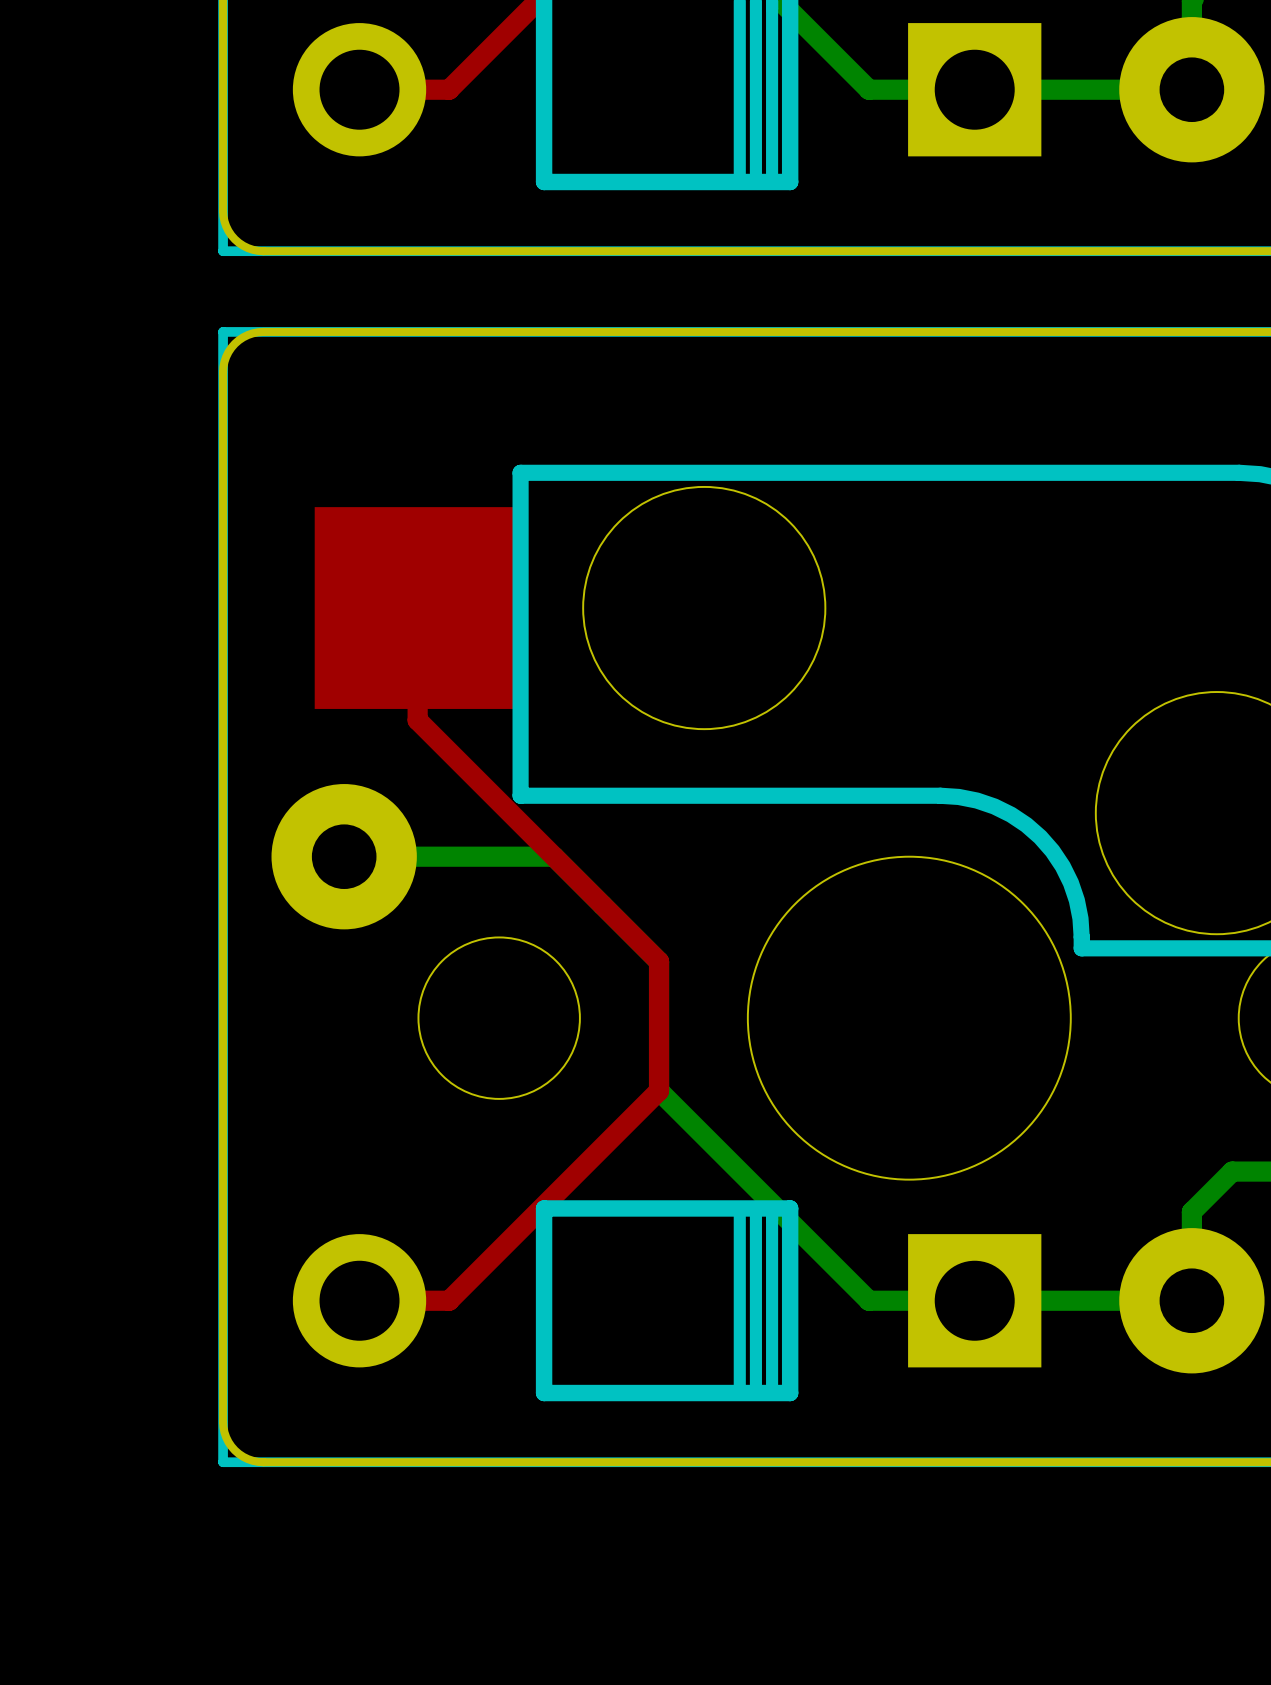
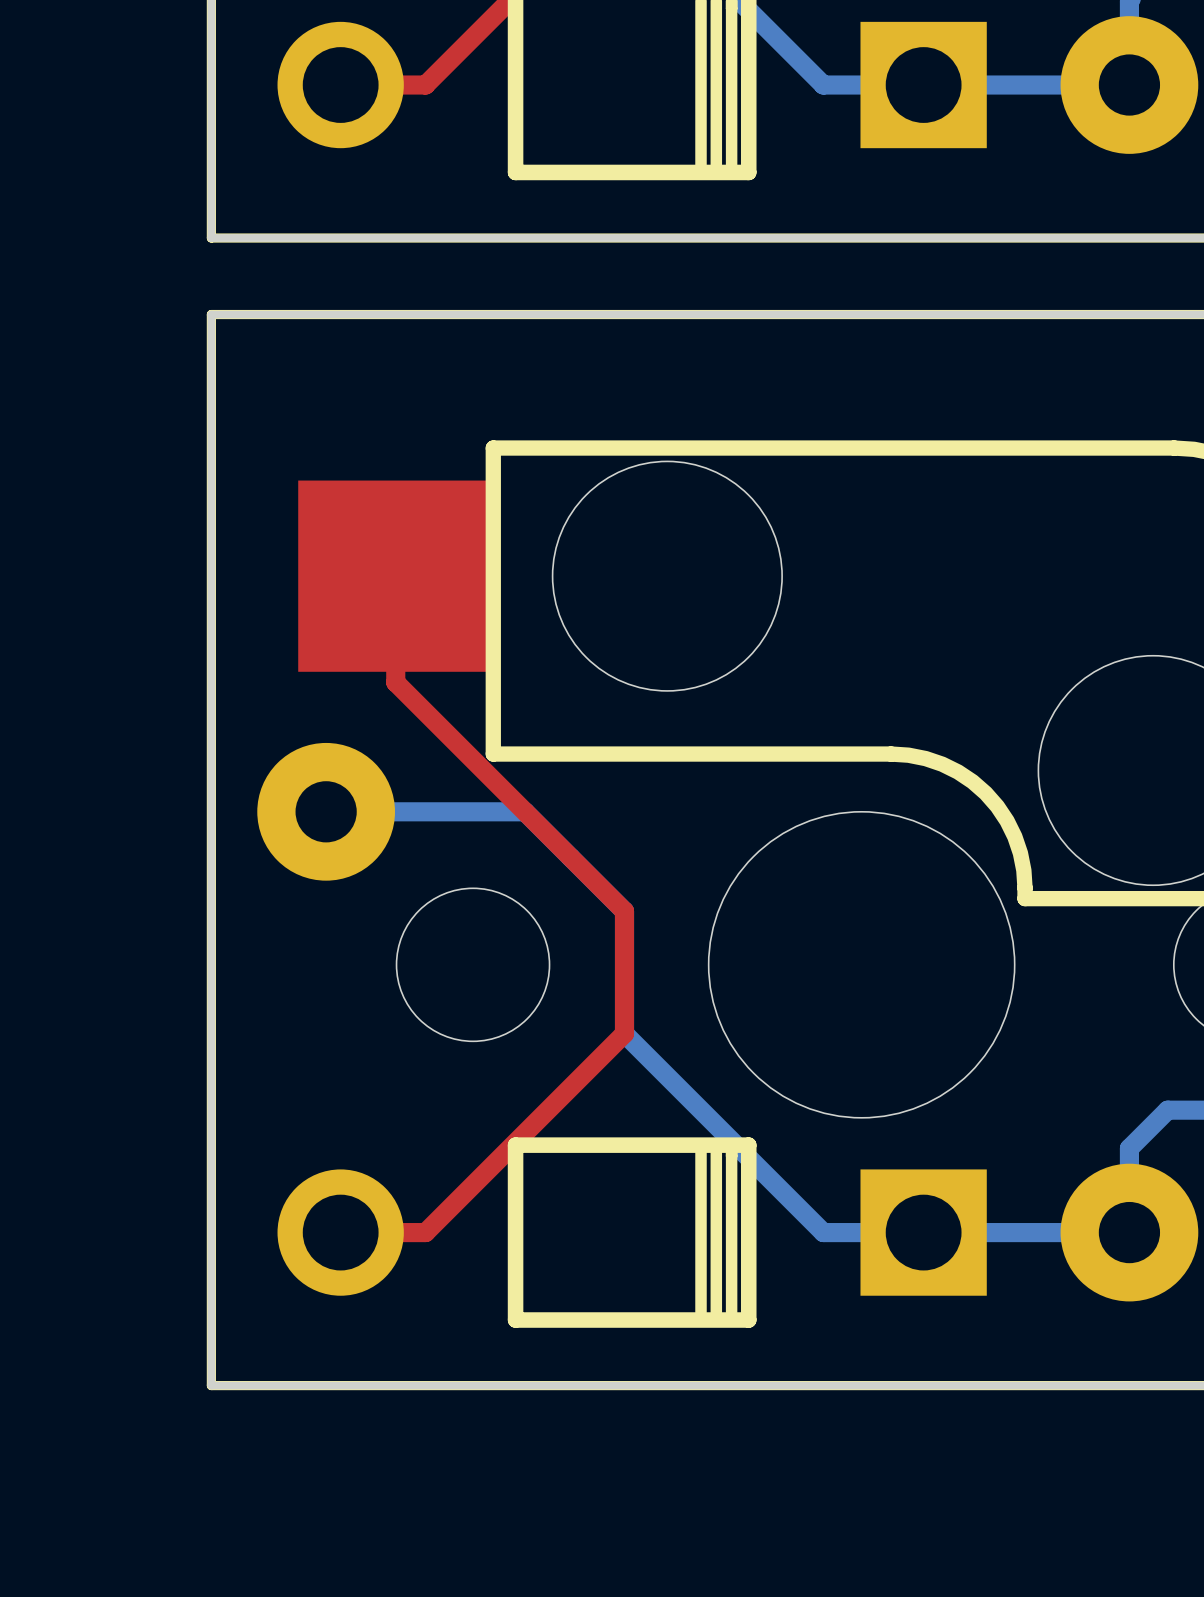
board edge: (223, 210) (226, 226) (234, 239) (247, 248) (263, 251) -> (211, 199) (211, 238) (249, 238)
board edge: (263, 331) (247, 335) (234, 343) (226, 356) (223, 372) -> (249, 314) (211, 314) (211, 352)
board edge: (223, 1421) (226, 1437) (234, 1450) (247, 1459) (263, 1462) -> (211, 1347) (211, 1385) (249, 1385)

